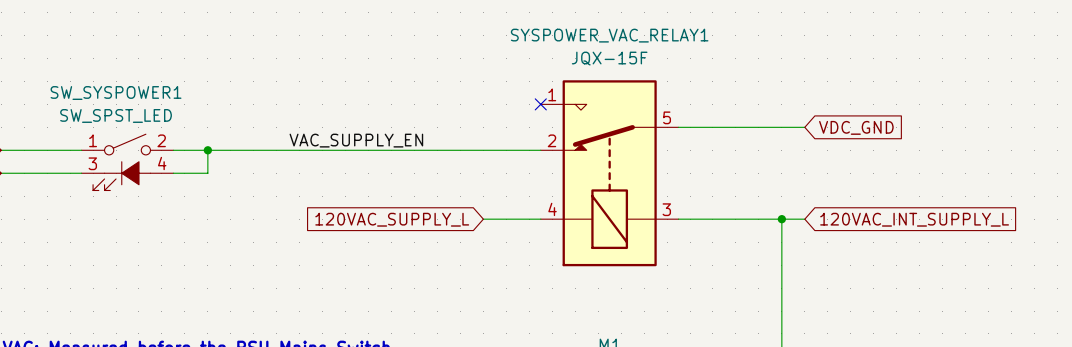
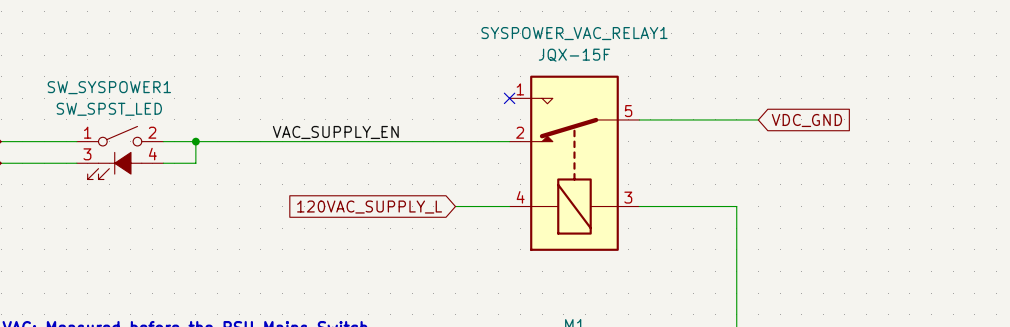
wire: (781, 219) (804, 219) -> none
junction: (781, 219) -> none
global label: 120VAC_INT_SUPPLY_L (914, 219) -> none

